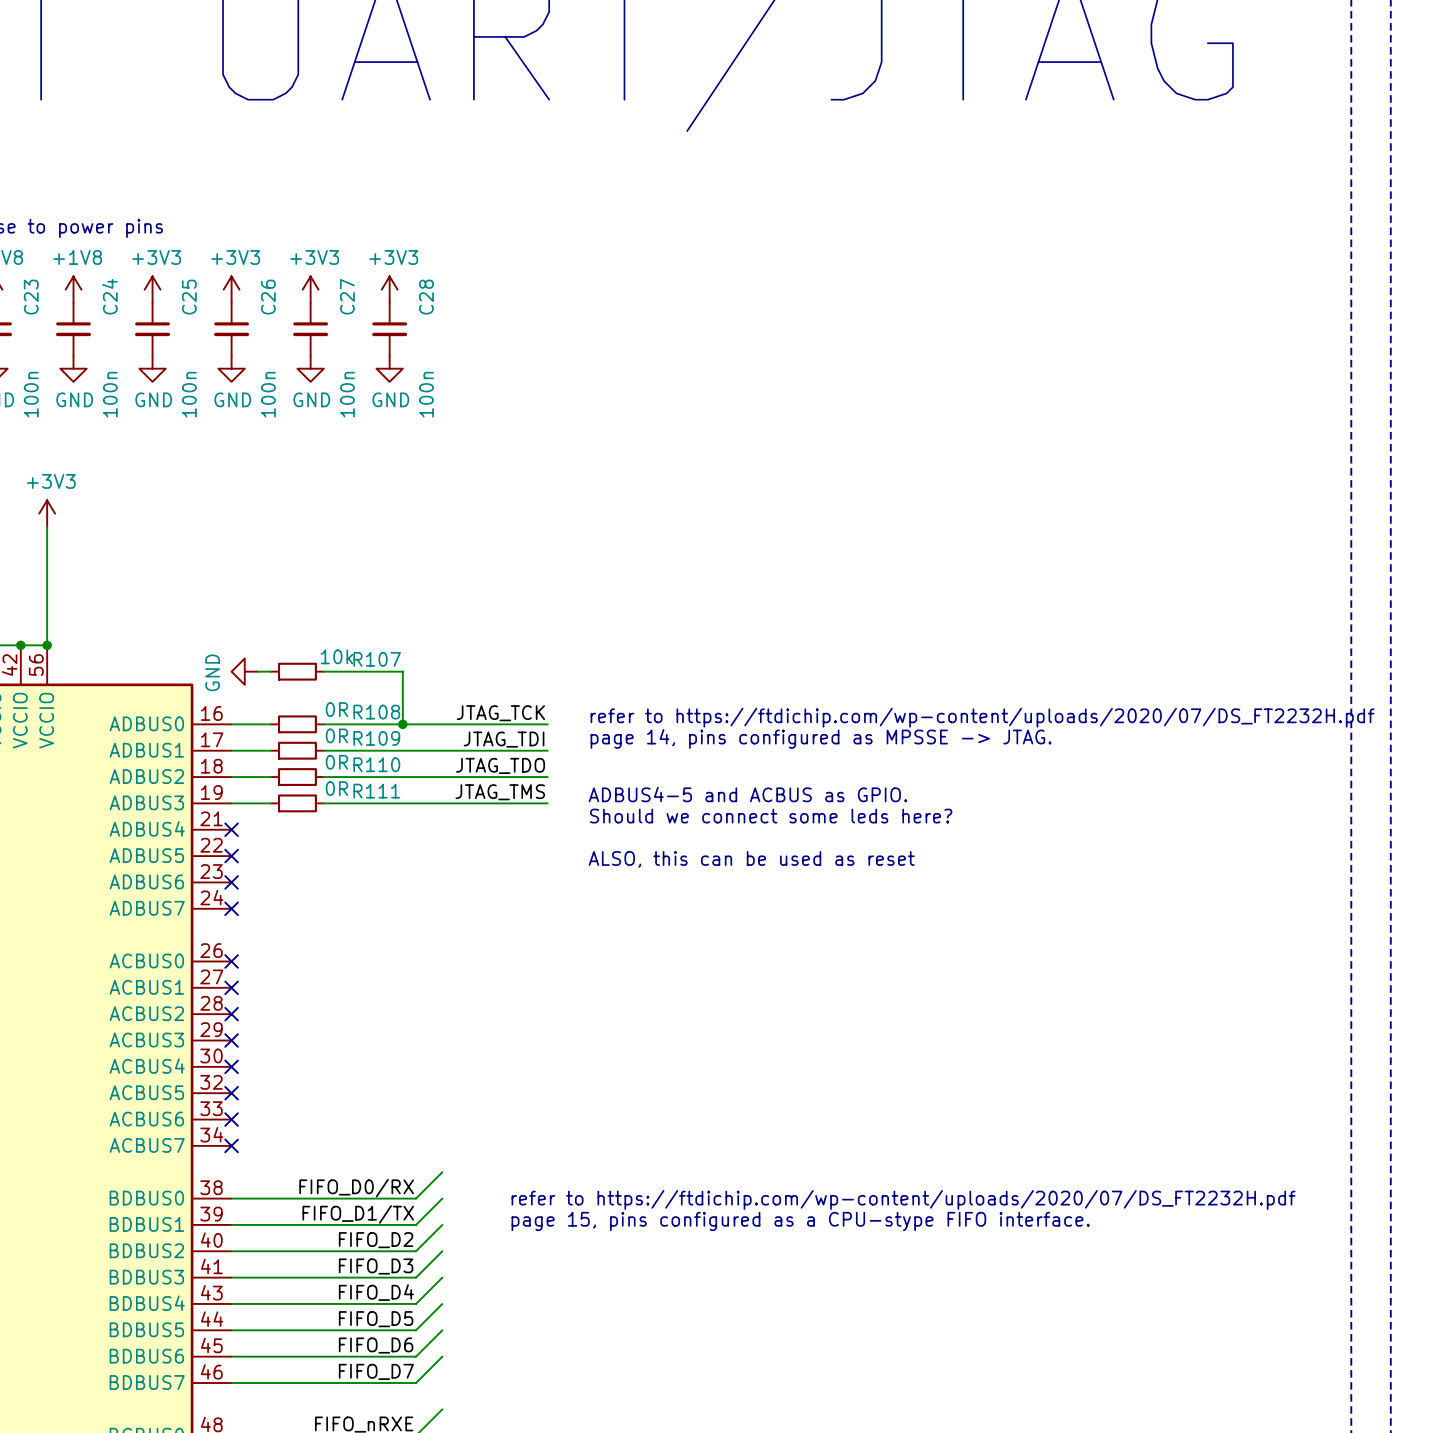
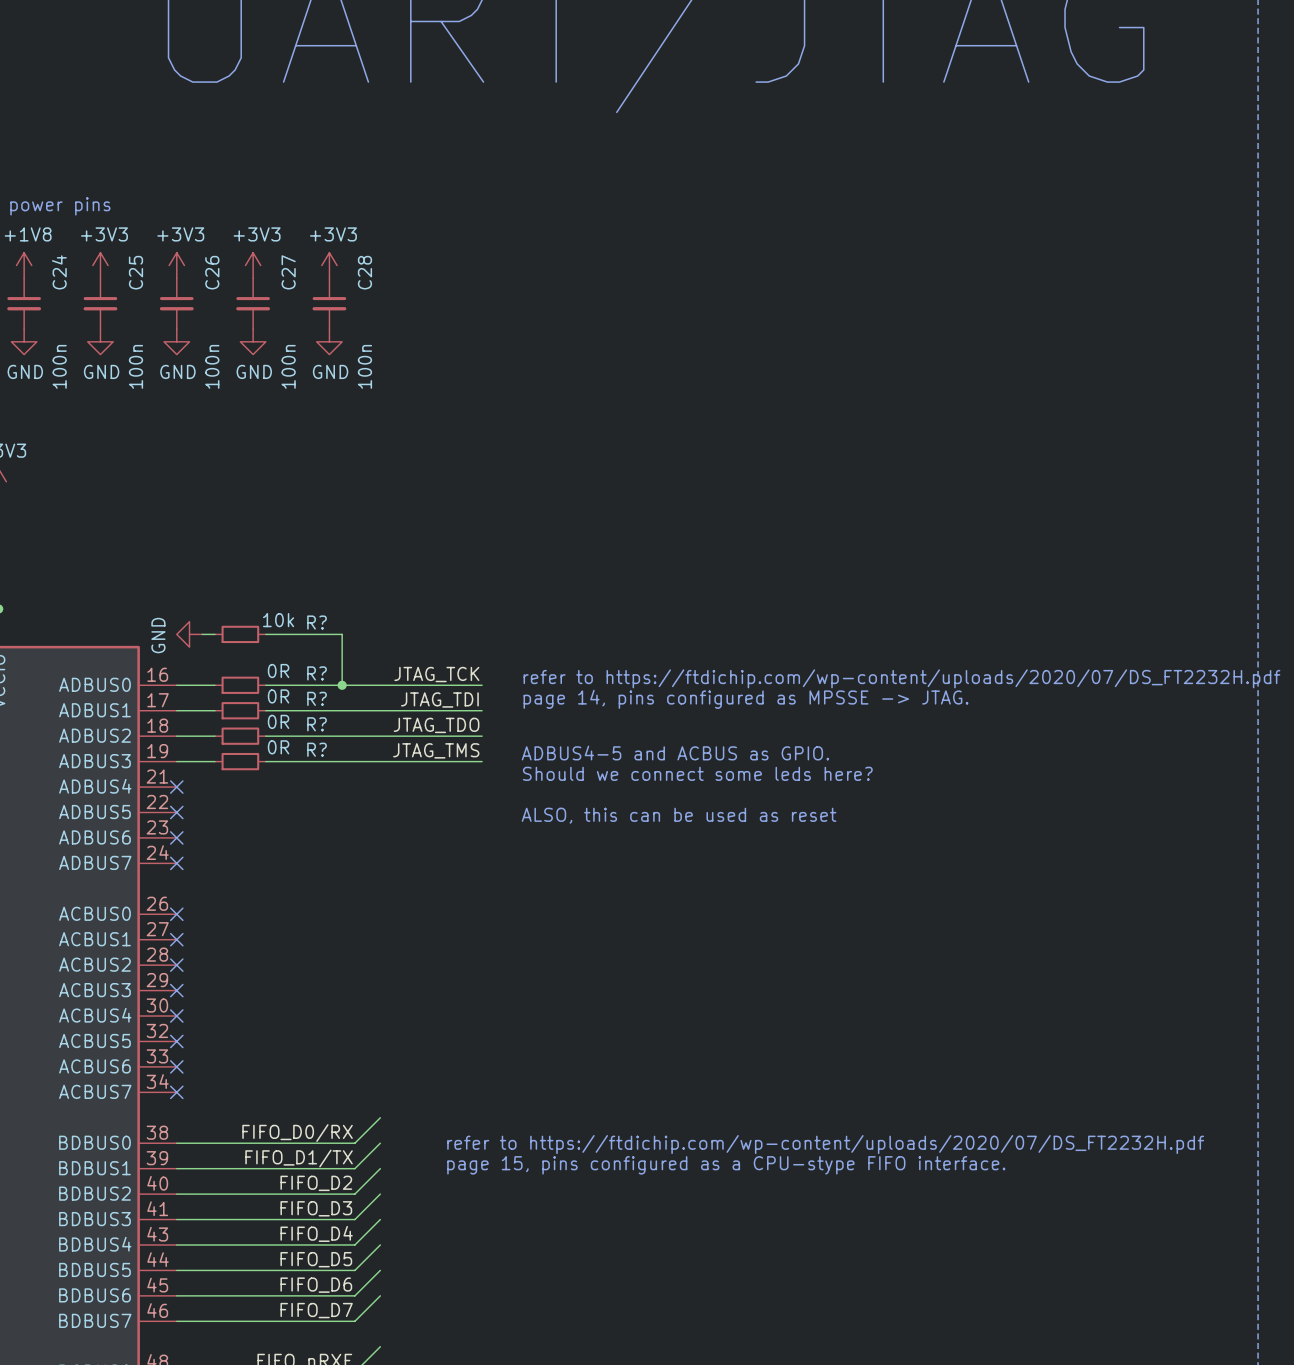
R107 name: R107 (377, 659) -> R? (317, 622)
R108 name: R108 (376, 712) -> R? (317, 673)
R109 name: R109 (376, 738) -> R? (317, 698)
R110 name: R110 (376, 764) -> R? (317, 724)
R111 name: R111 (376, 791) -> R? (317, 749)

